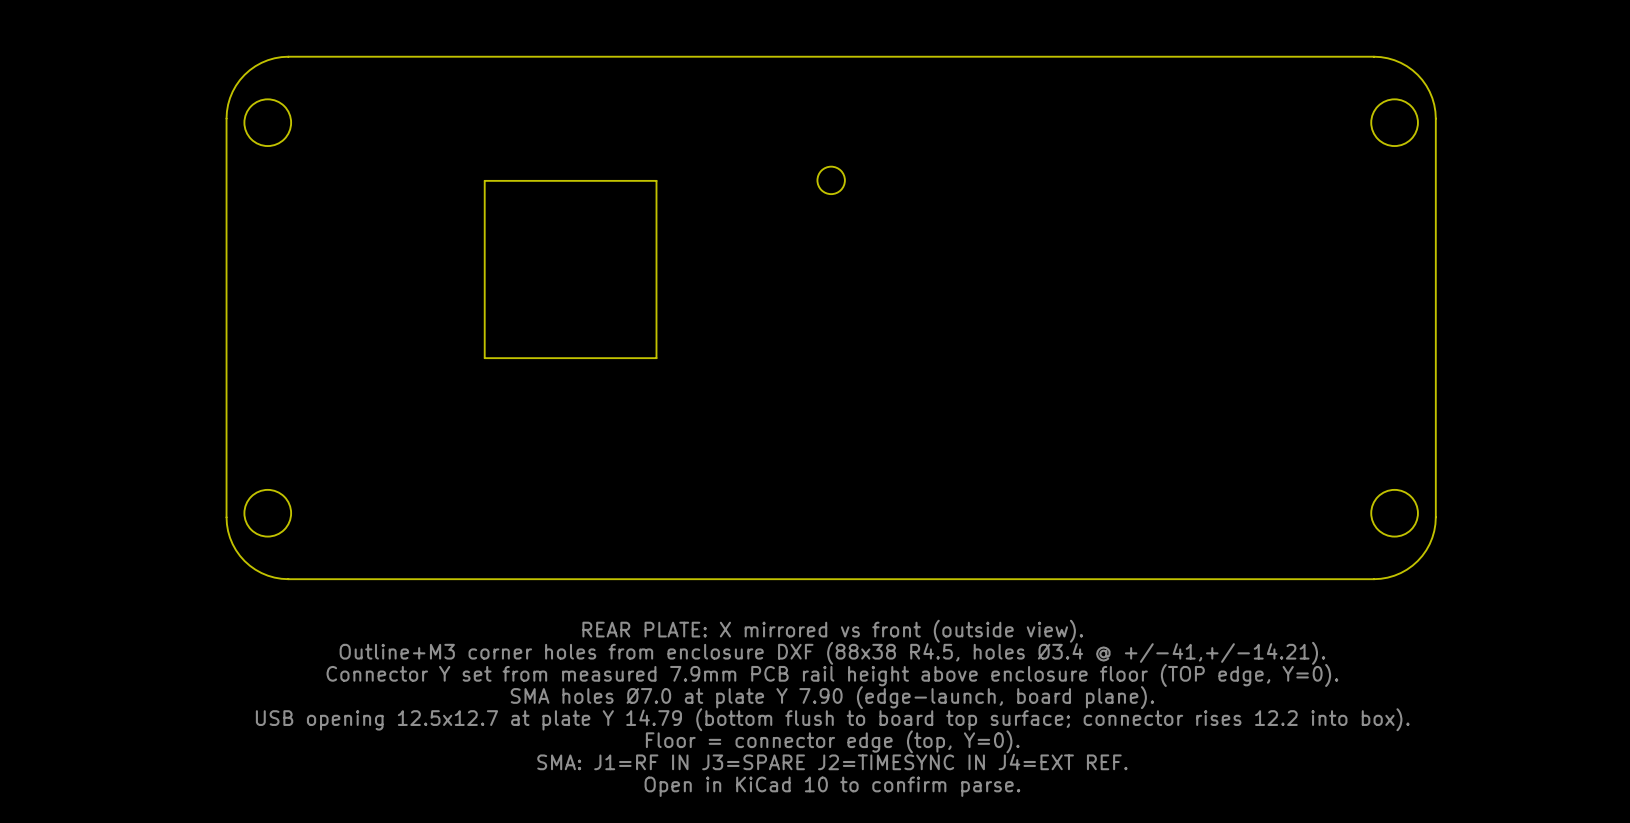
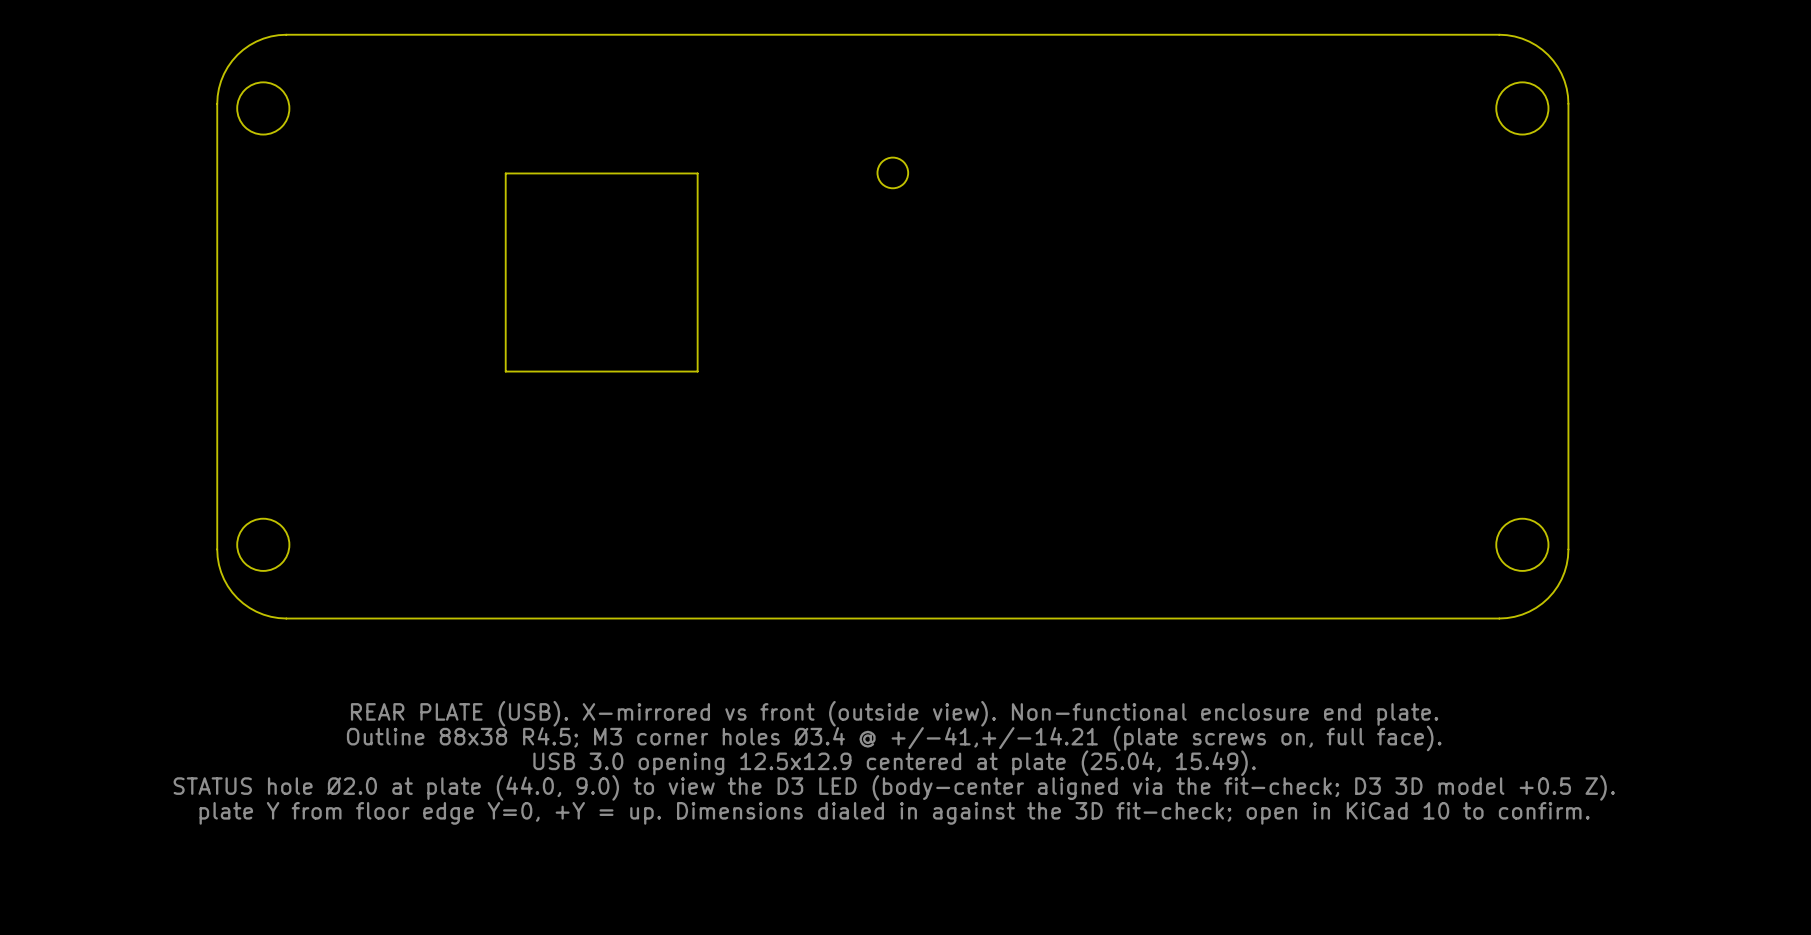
text: REAR PLATE: X mirrored vs front (outside view). (832, 631) -> none
text: Outline+M3 corner holes from enclosure DXF (88x38 R4.5, holes Ø3.4 @ +/-41,+/-14.21). (832, 653) -> none
text: none -> REAR PLATE (USB). X-mirrored vs front (outside view). Non-functional enclosure end plate. (894, 713)
text: Connector Y set from measured 7.9mm PCB rail height above enclosure floor (TOP edge, Y=0). (832, 675) -> none
text: none -> Outline 88x38 R4.5; M3 corner holes Ø3.4 @ +/-41,+/-14.21 (plate screws on, full face). (894, 738)
text: SMA holes Ø7.0 at plate Y 7.90 (edge-launch, board plane). (832, 697) -> none
text: none -> USB 3.0 opening 12.5x12.9 centered at plate (25.04, 15.49). (894, 763)
text: USB opening 12.5x12.7 at plate Y 14.79 (bottom flush to board top surface; connector rises 12.2 into box). (832, 719) -> none
text: none -> STATUS hole Ø2.0 at plate (44.0, 9.0) to view the D3 LED (body-center aligned via the fit-check; D3 3D model +0.5 Z). (894, 787)
text: Floor = connector edge (top, Y=0). (832, 741) -> none
text: none -> plate Y from floor edge Y=0, +Y = up. Dimensions dialed in against the 3D fit-check; open in KiCad 10 to confirm. (894, 813)
text: SMA: J1=RF IN J3=SPARE J2=TIMESYNC IN J4=EXT REF. (832, 762) -> none
text: Open in KiCad 10 to confirm parse. (832, 786) -> none

